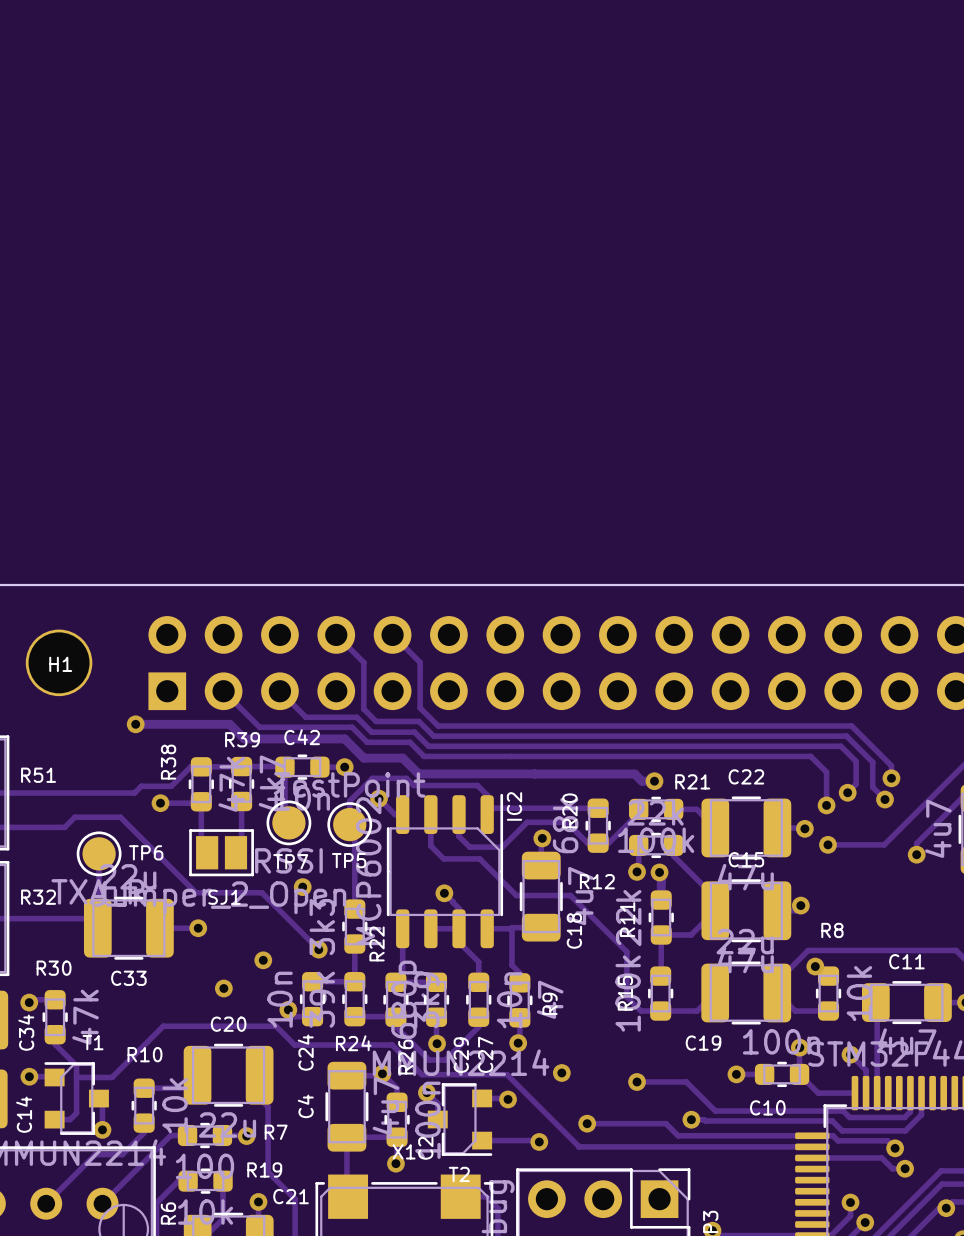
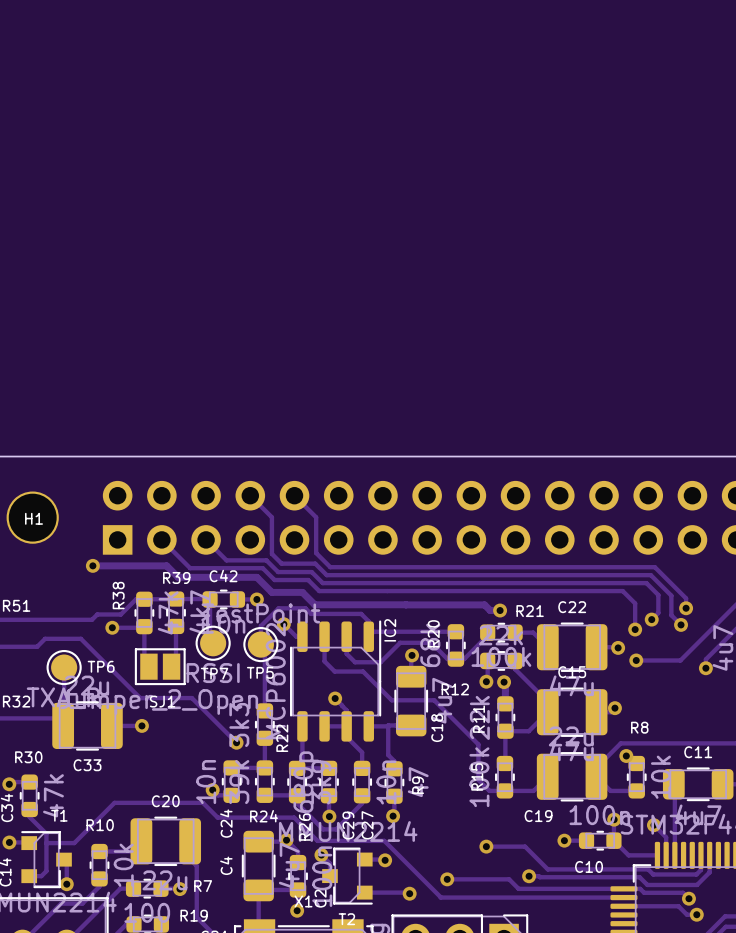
via: (302, 887) -> none
via: (263, 960) -> none
via: (223, 988) -> none
via: (561, 1072) -> none

